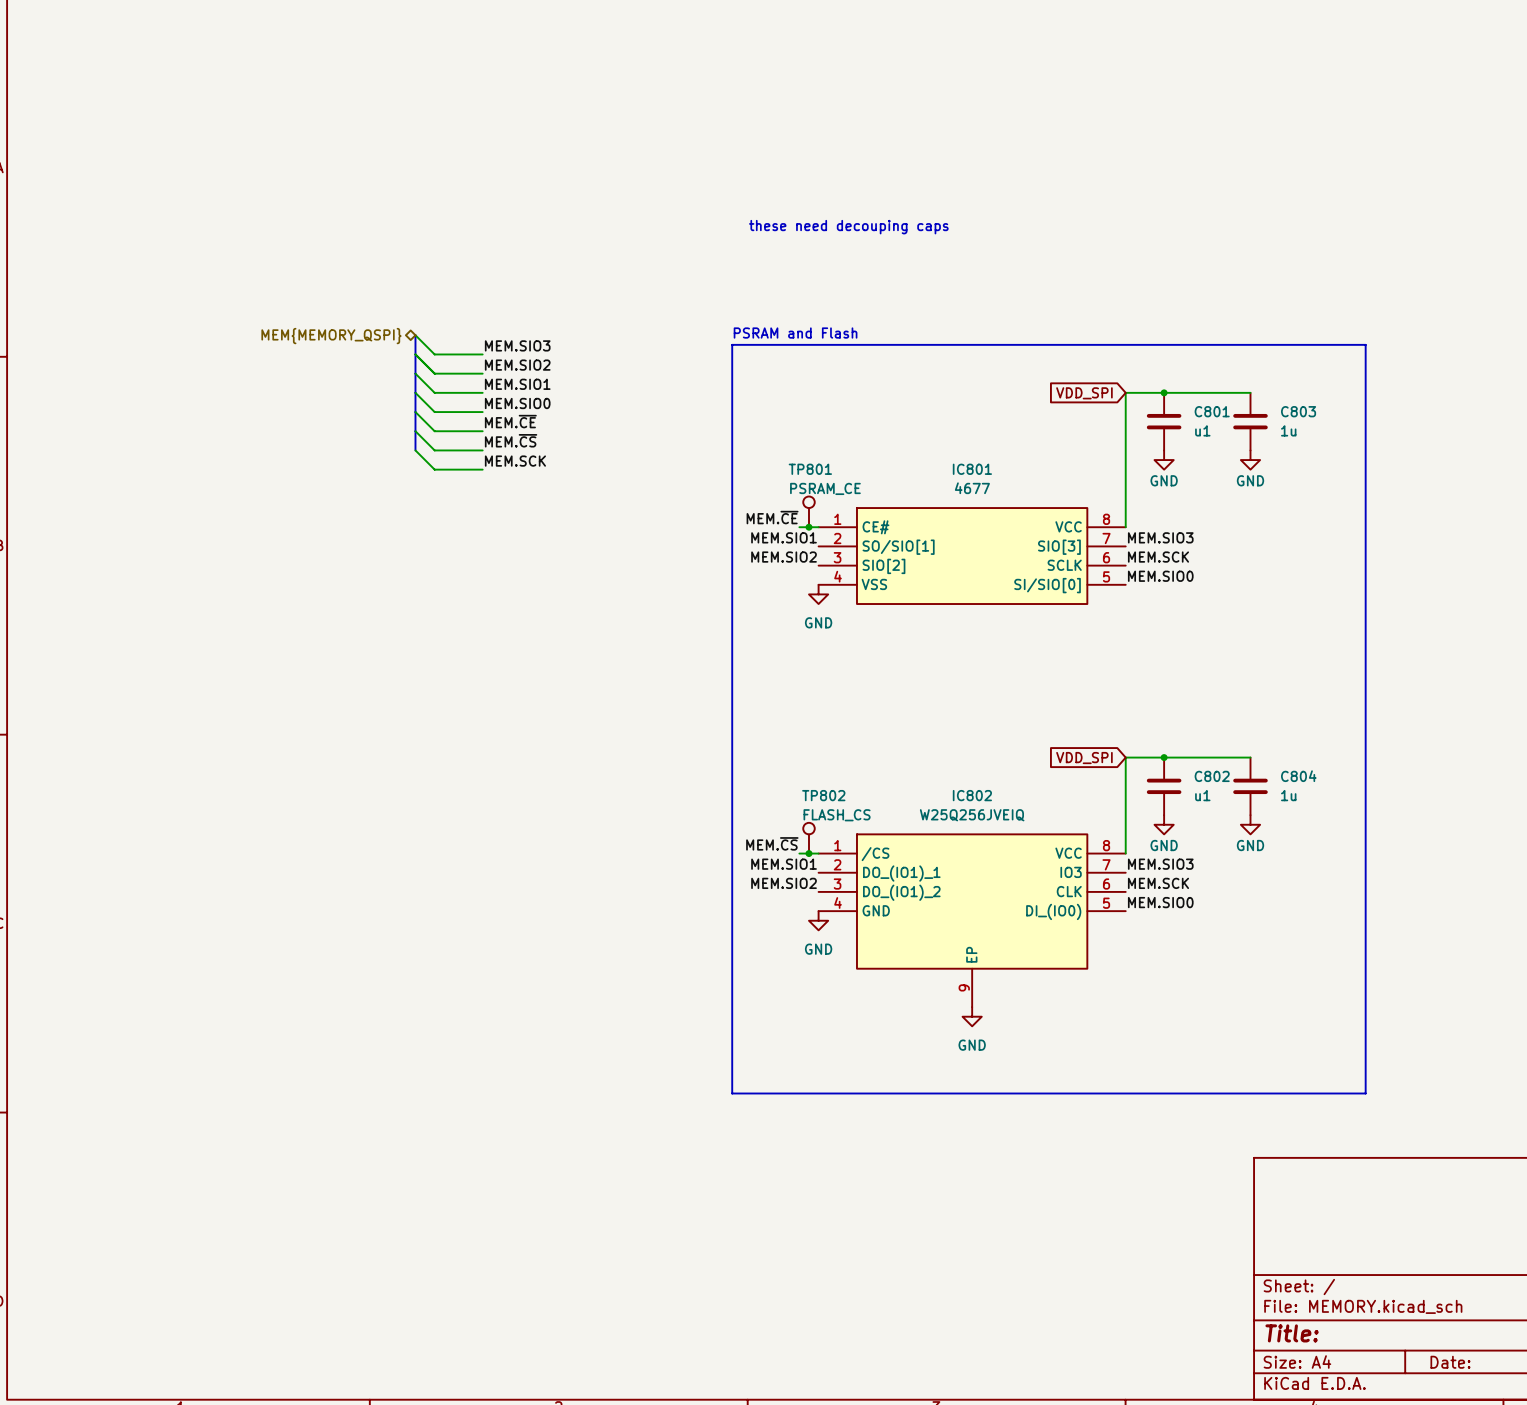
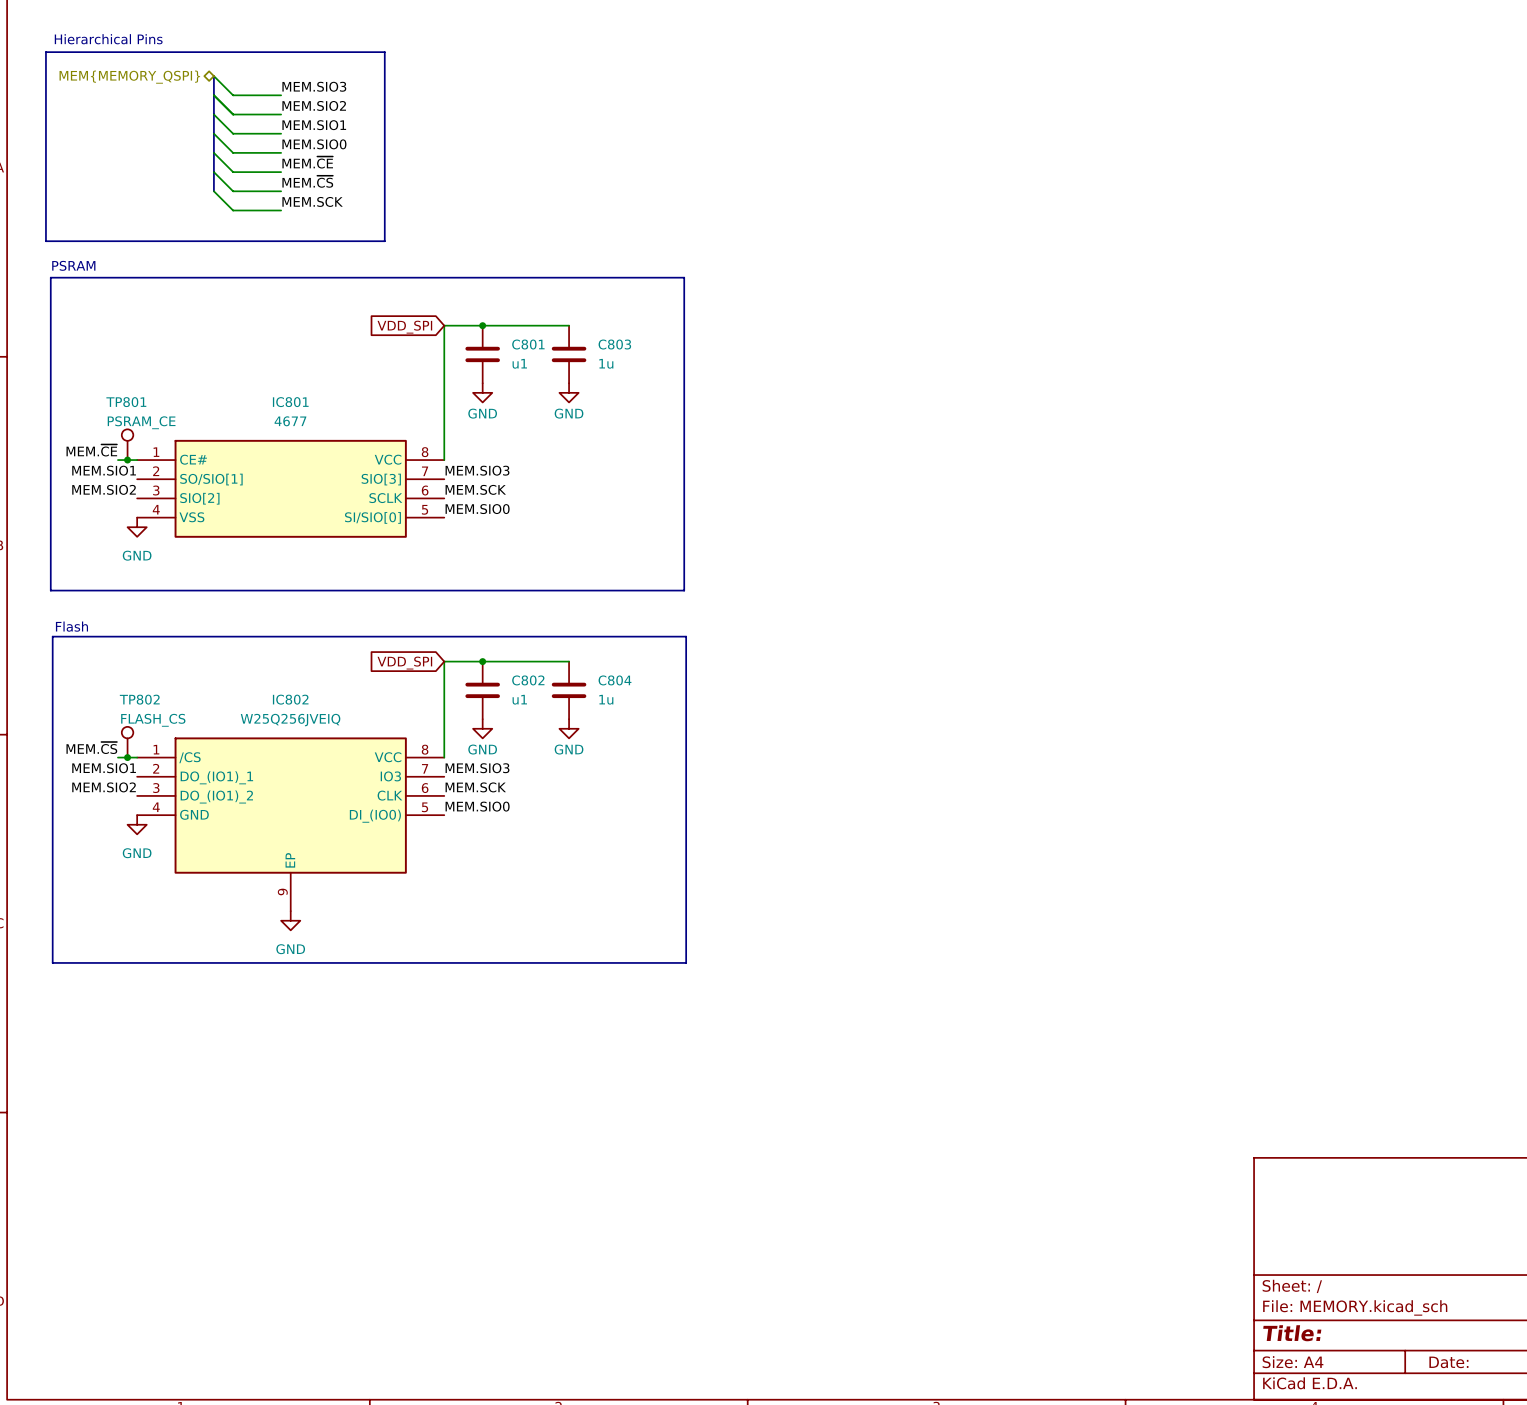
text: none -> Hierarchical Pins (108, 39)
line: none -> (45, 52) (384, 52) (384, 241) (45, 241) (45, 52)
hierarchical label: none -> MEM{MEMORY_QSPI} (129, 77)
wire: none -> (213, 76) (233, 95) (281, 95)
bus: none -> (213, 76) (213, 191)
label: none -> MEM.SIO3 (314, 86)
wire: none -> (213, 95) (233, 114) (281, 114)
label: none -> MEM.SIO2 (314, 105)
wire: none -> (213, 114) (233, 133) (281, 133)
label: none -> MEM.SIO1 (314, 125)
wire: none -> (213, 133) (233, 152) (281, 152)
label: none -> MEM.SIO0 (314, 144)
wire: none -> (213, 152) (233, 172) (281, 172)
label: none -> MEM.~{CE} (307, 162)
wire: none -> (213, 172) (233, 191) (281, 191)
label: none -> MEM.~{CS} (307, 181)
wire: none -> (213, 191) (233, 210) (281, 210)
label: none -> MEM.SCK (312, 201)
text: these need decouping caps (848, 227) -> none
text: none -> PSRAM (73, 265)
line: none -> (50, 277) (684, 277) (684, 590) (50, 590) (50, 277)
junction: none -> (482, 325)
wire: none -> (569, 325) (444, 325) (444, 460)
global label: none -> VDD_SPI (404, 327)
text: PSRAM and Flash (795, 333) -> none
wire: (415, 335) (434, 354) (482, 354) -> none
bus: (415, 335) (415, 450) -> none
hierarchical label: MEM{MEMORY_QSPI} (331, 336) -> none
line: (732, 344) (1365, 344) (1365, 1093) (732, 1093) (732, 344) -> none
label position: MEM.SIO3 (517, 345) -> MEM.SIO3 (477, 470)
wire: (415, 354) (434, 373) (482, 373) -> none
label: MEM.SIO2 (517, 365) -> none
wire: (415, 373) (434, 392) (482, 392) -> none
label: MEM.SIO1 (517, 384) -> none
wire: (415, 392) (434, 412) (482, 412) -> none
power symbol: none -> GND (482, 392)
power symbol: none -> GND (569, 392)
junction: (1164, 392) -> none
wire: (1250, 392) (1125, 392) (1125, 527) -> none
global label: VDD_SPI (1084, 393) -> none
label position: MEM.SIO0 (517, 403) -> MEM.SIO0 (477, 509)
wire: (415, 412) (434, 431) (482, 431) -> none
label: MEM.~{CE} (510, 421) -> none
C801 position: (1164, 421) -> (482, 354)
C803 position: (1250, 421) -> (569, 354)
wire: (415, 431) (434, 450) (482, 450) -> none
label: MEM.~{CS} (511, 440) -> none
label: none -> MEM.~{CE} (91, 450)
wire: (415, 450) (434, 469) (482, 469) -> none
wire: none -> (117, 460) (137, 460)
junction: none -> (127, 460)
power symbol: GND (1164, 460) -> none
power symbol: GND (1250, 460) -> none
label position: MEM.SCK (515, 461) -> MEM.SCK (475, 489)
label: none -> MEM.SIO1 (104, 470)
label: none -> MEM.SIO2 (104, 489)
TP801 position: (808, 511) -> (127, 444)
label: MEM.~{CE} (772, 517) -> none
power symbol: none -> GND (137, 527)
wire: (799, 527) (818, 527) -> none
junction: (808, 527) -> none
label: MEM.SIO1 (784, 537) -> none
label: MEM.SIO3 (1160, 537) -> none
IC801 position: (972, 556) -> (290, 488)
label: MEM.SIO2 (784, 557) -> none
label: MEM.SCK (1158, 557) -> none
label: MEM.SIO0 (1160, 576) -> none
power symbol: GND (818, 594) -> none
text: none -> Flash (71, 626)
line: none -> (52, 636) (686, 636) (686, 962) (52, 962) (52, 636)
junction: none -> (482, 661)
wire: none -> (569, 661) (444, 661) (444, 757)
global label: none -> VDD_SPI (404, 663)
power symbol: none -> GND (482, 728)
power symbol: none -> GND (569, 728)
label: none -> MEM.~{CS} (91, 748)
wire: none -> (117, 757) (137, 757)
junction: none -> (127, 757)
junction: (1164, 757) -> none
wire: (1250, 757) (1125, 757) (1125, 853) -> none
global label: VDD_SPI (1084, 758) -> none
label: none -> MEM.SIO1 (104, 768)
label: none -> MEM.SIO3 (477, 768)
C802 position: (1164, 786) -> (482, 690)
C804 position: (1250, 786) -> (569, 690)
label: none -> MEM.SIO2 (104, 787)
label: none -> MEM.SCK (475, 787)
label: none -> MEM.SIO0 (477, 806)
power symbol: none -> GND (137, 824)
power symbol: GND (1164, 824) -> none
power symbol: GND (1250, 824) -> none
TP802 position: (808, 838) -> (127, 742)
label: MEM.~{CS} (772, 843) -> none
wire: (799, 853) (818, 853) -> none
junction: (808, 853) -> none
label: MEM.SIO1 (784, 864) -> none
label: MEM.SIO3 (1160, 864) -> none
label: MEM.SIO2 (784, 883) -> none
label: MEM.SCK (1158, 883) -> none
label: MEM.SIO0 (1160, 902) -> none
power symbol: none -> GND (290, 920)
power symbol: GND (818, 920) -> none
IC802 position: (972, 920) -> (290, 824)
power symbol: GND (972, 1016) -> none

